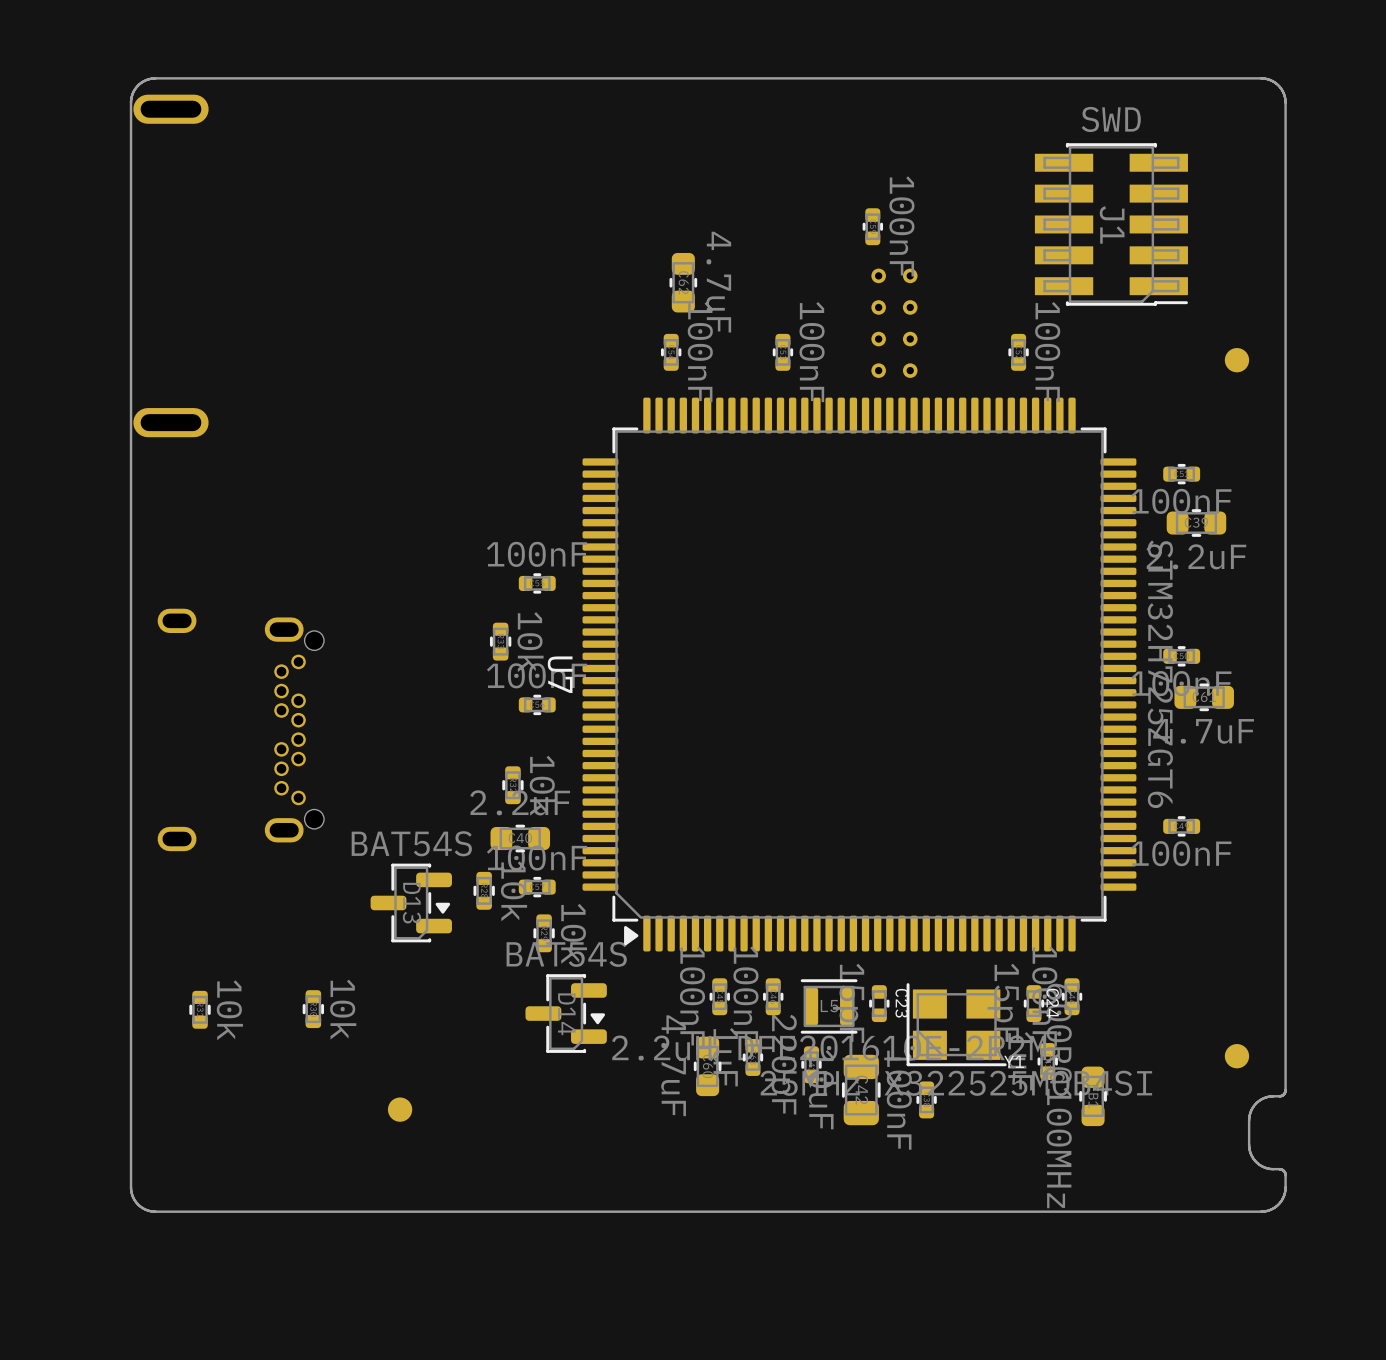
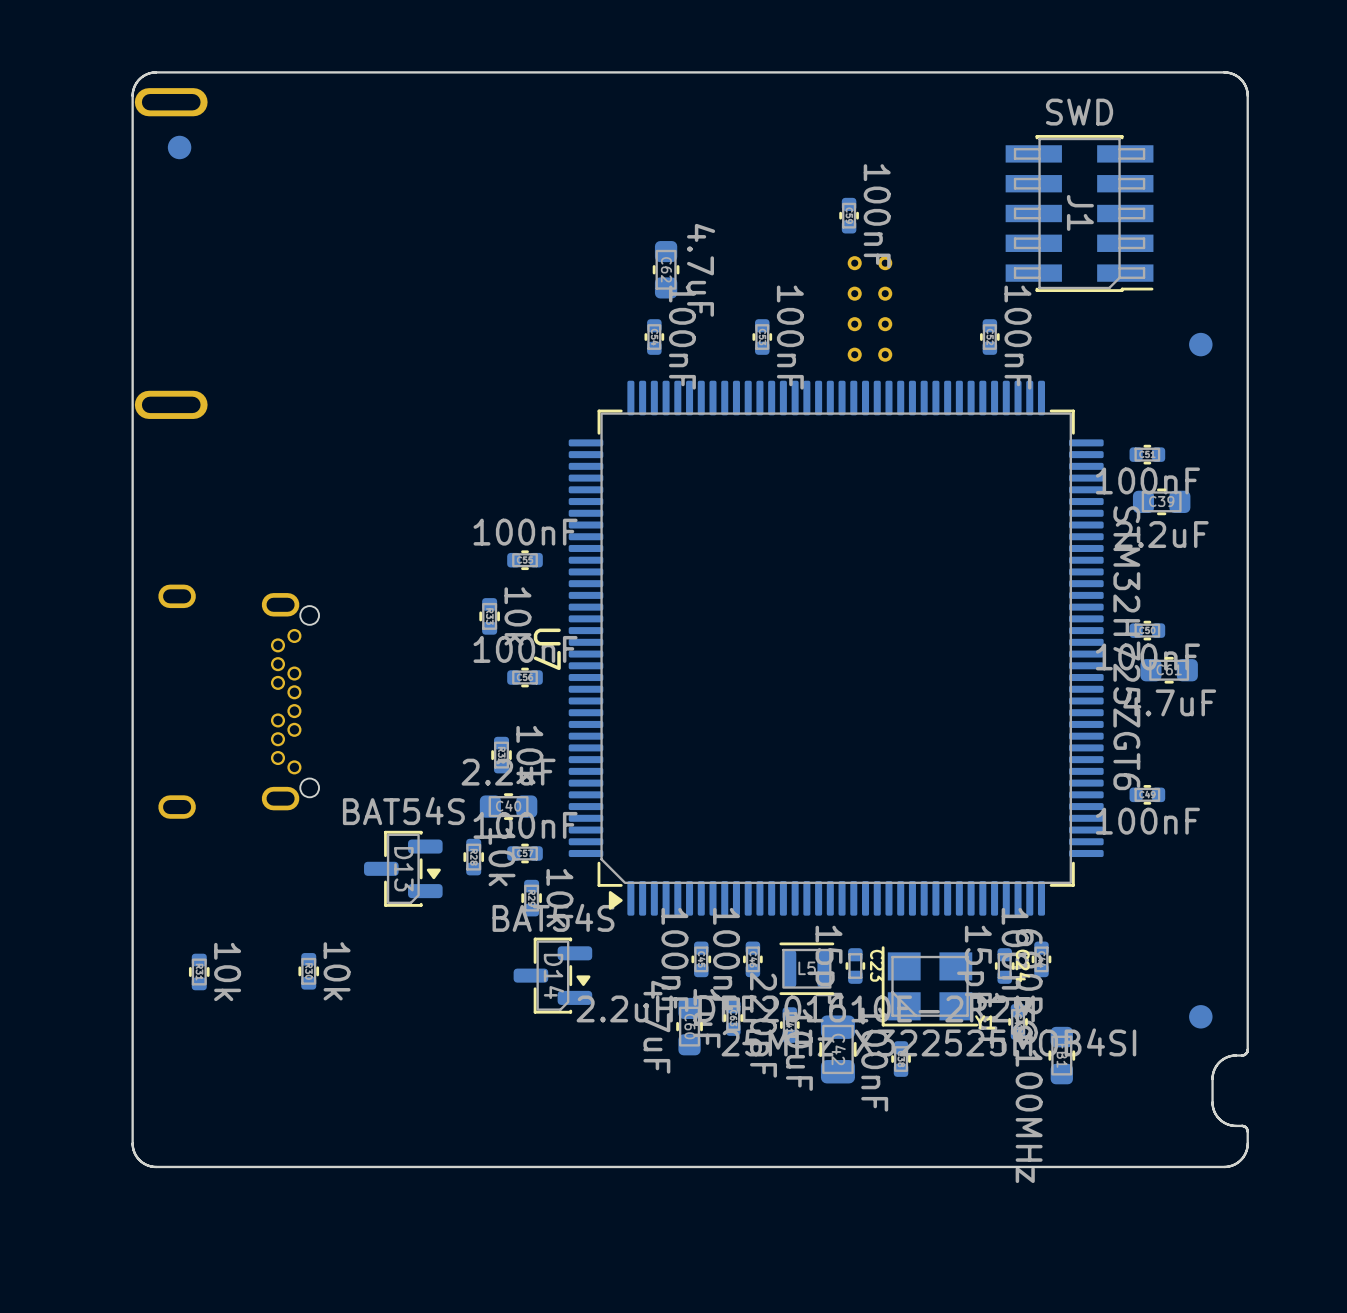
part: none -> (179, 147)
part: (400, 1109) -> none

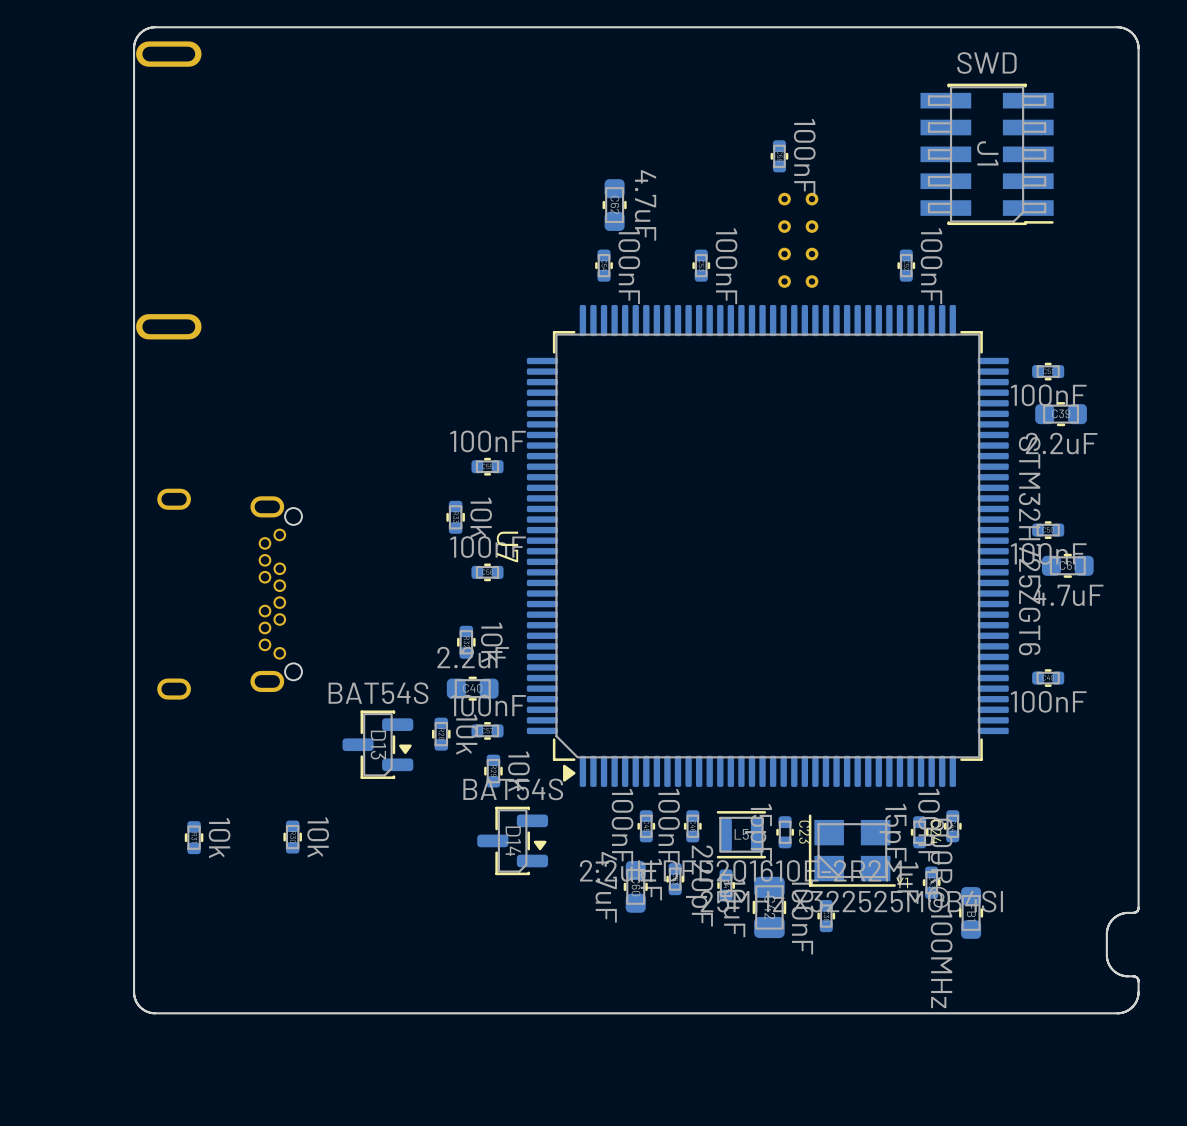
part: (179, 147) -> none
part: (1200, 344) -> none
part: (1200, 1016) -> none

